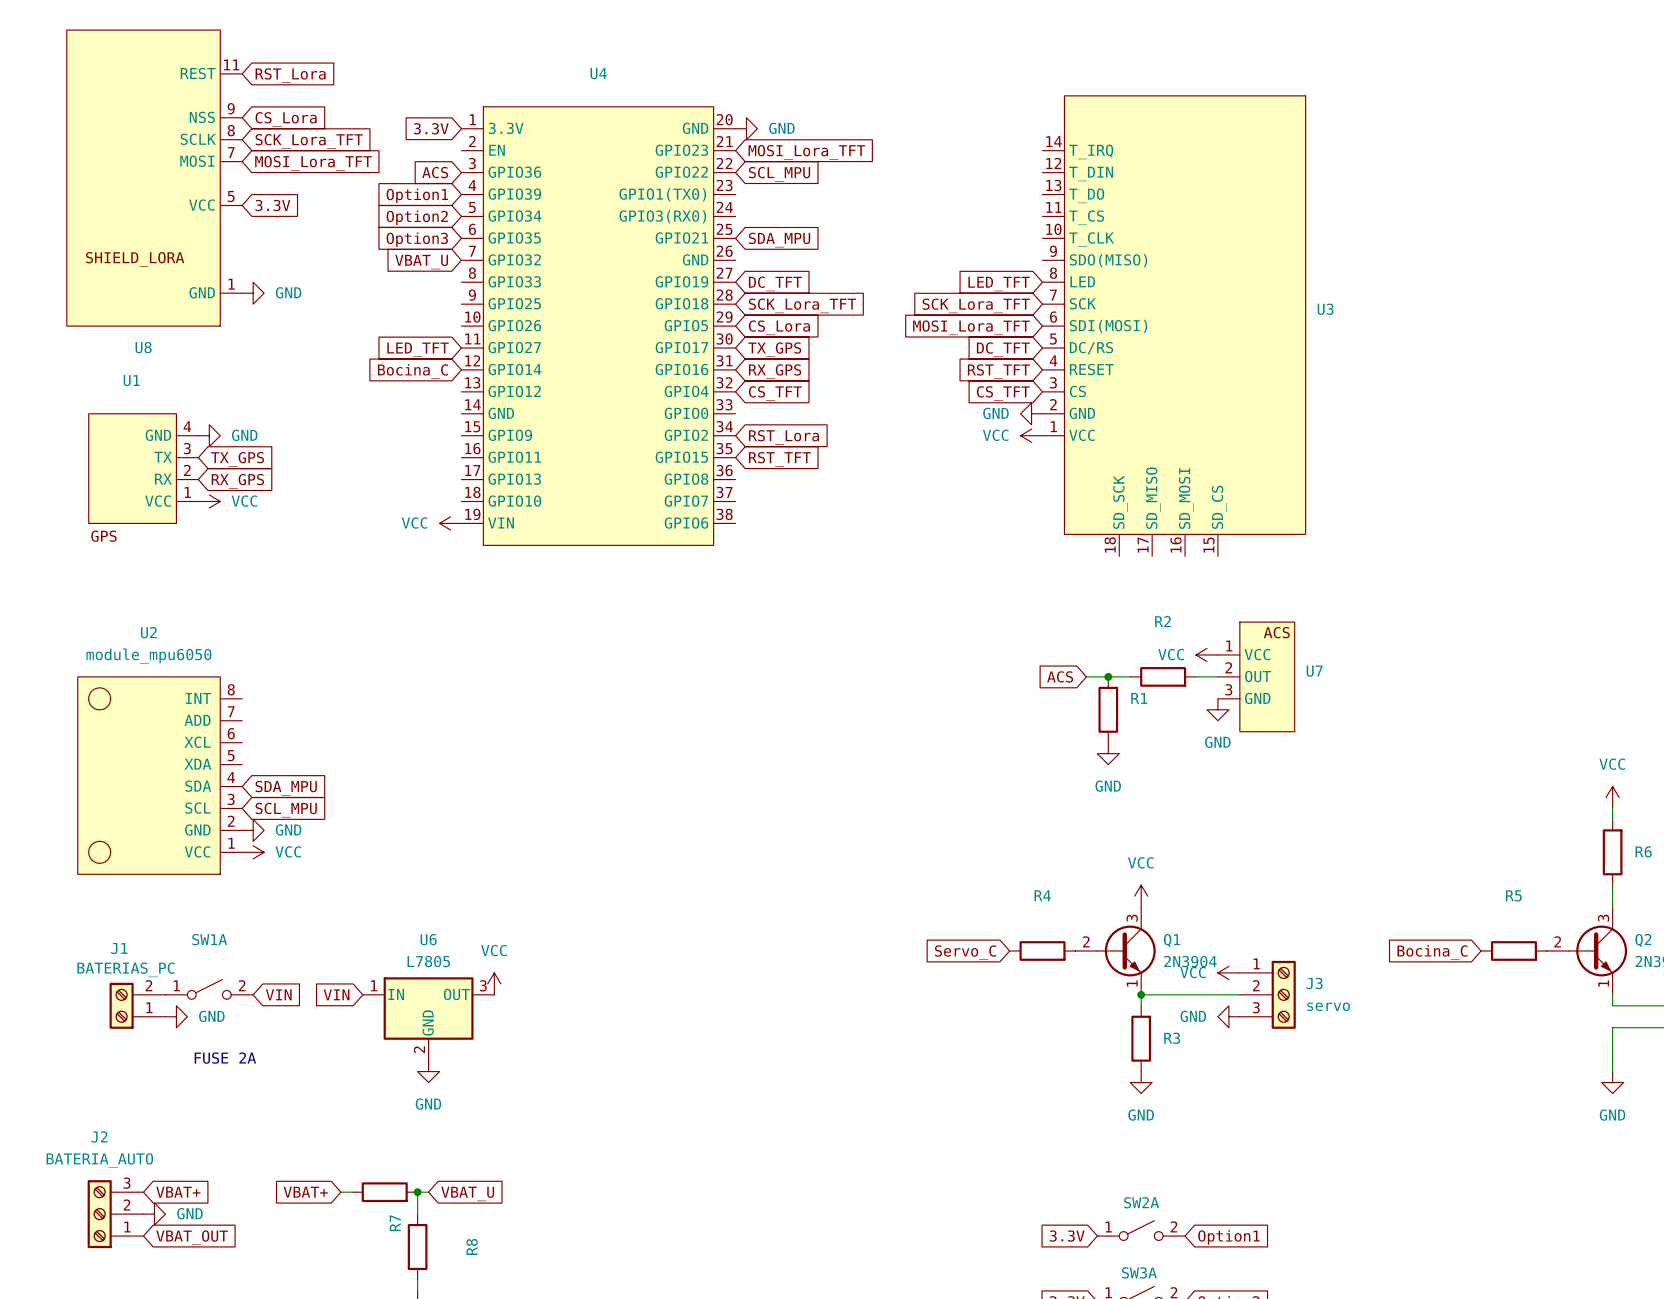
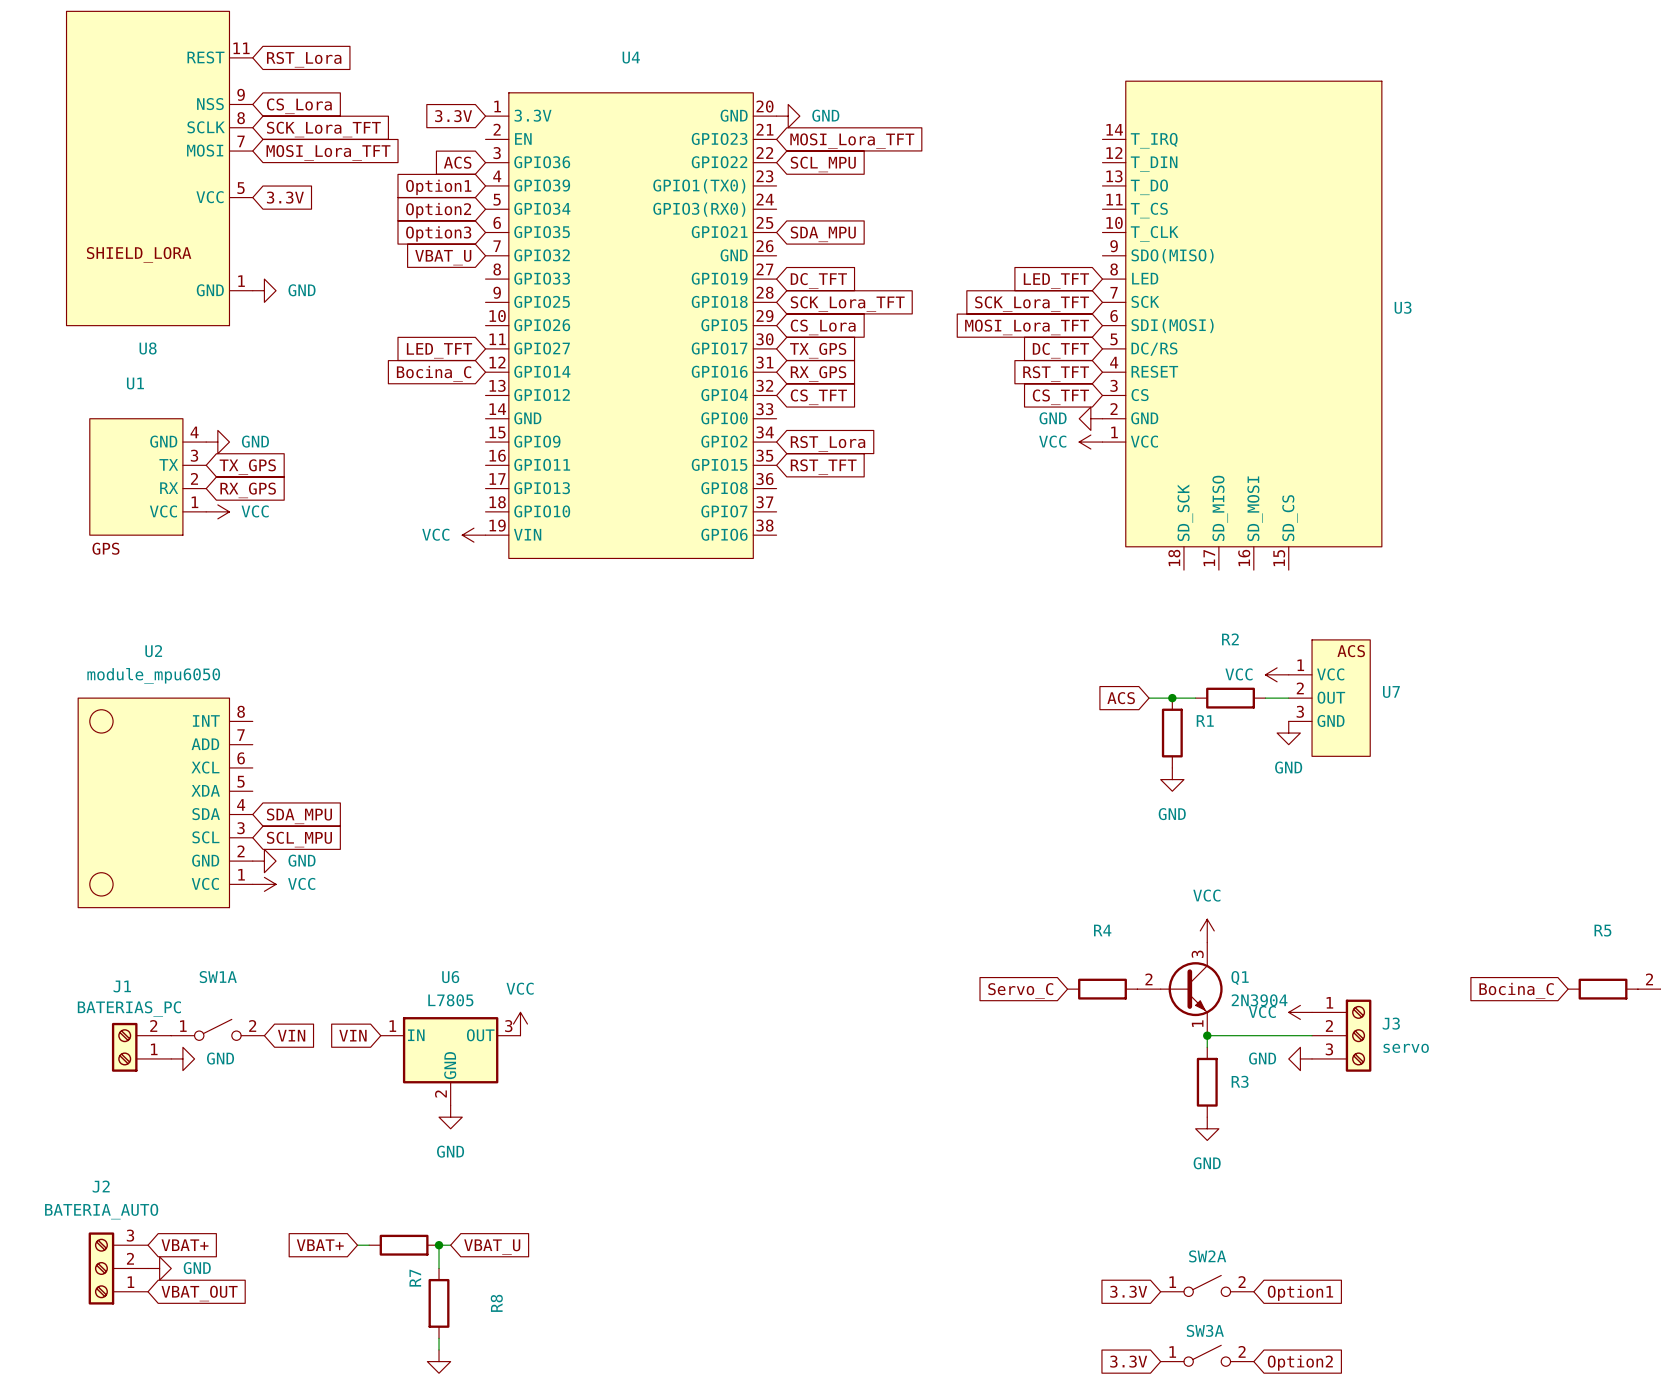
text: FUSE 2A (225, 1058) -> none

